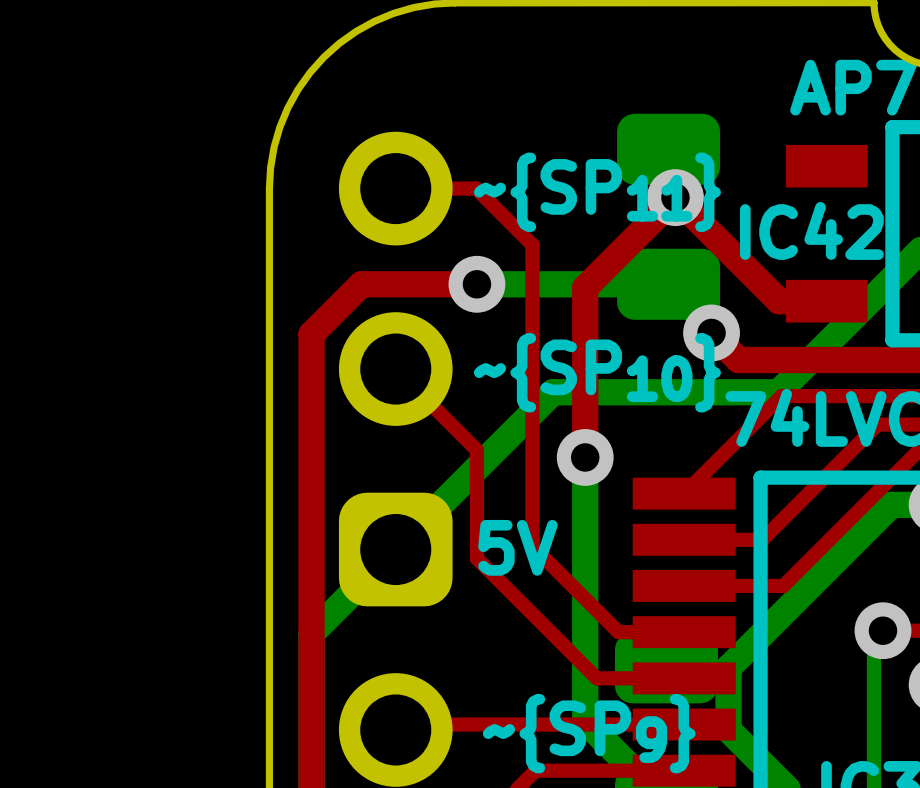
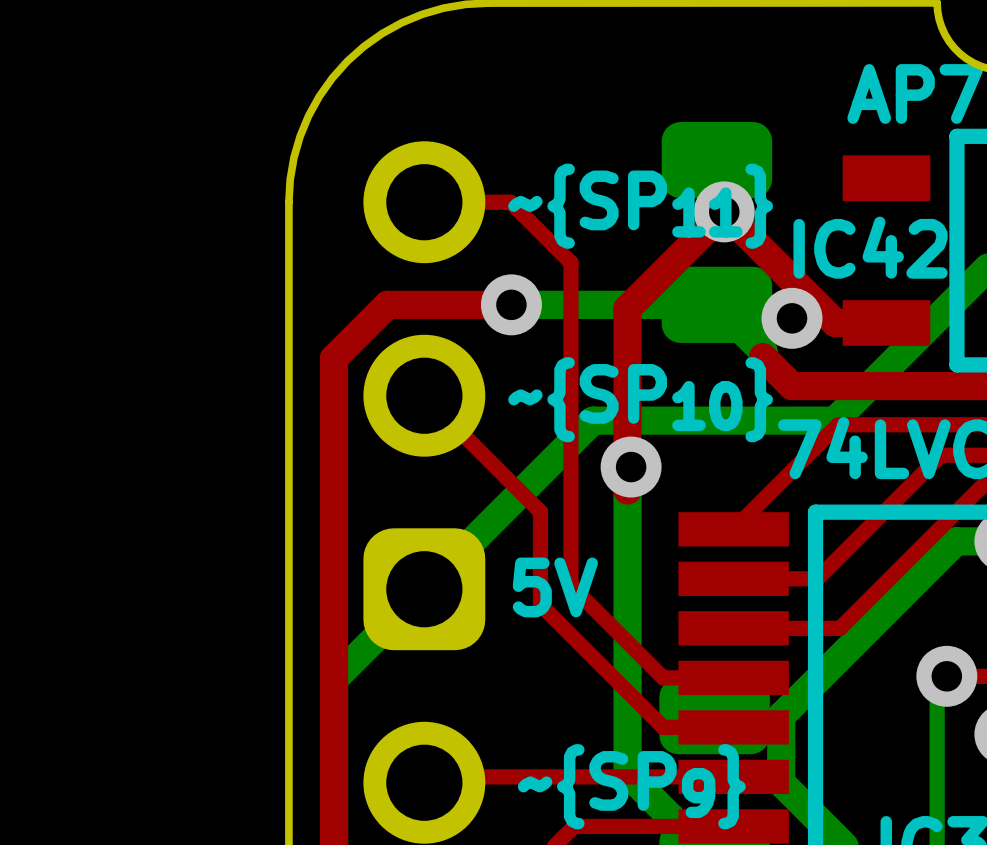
via position: (711, 332) -> (792, 318)
top track: (476, 450) (476, 558) (596, 678) (618, 678) -> (511, 482) (540, 511) (540, 604) (663, 727)
via position: (585, 457) -> (631, 467)

